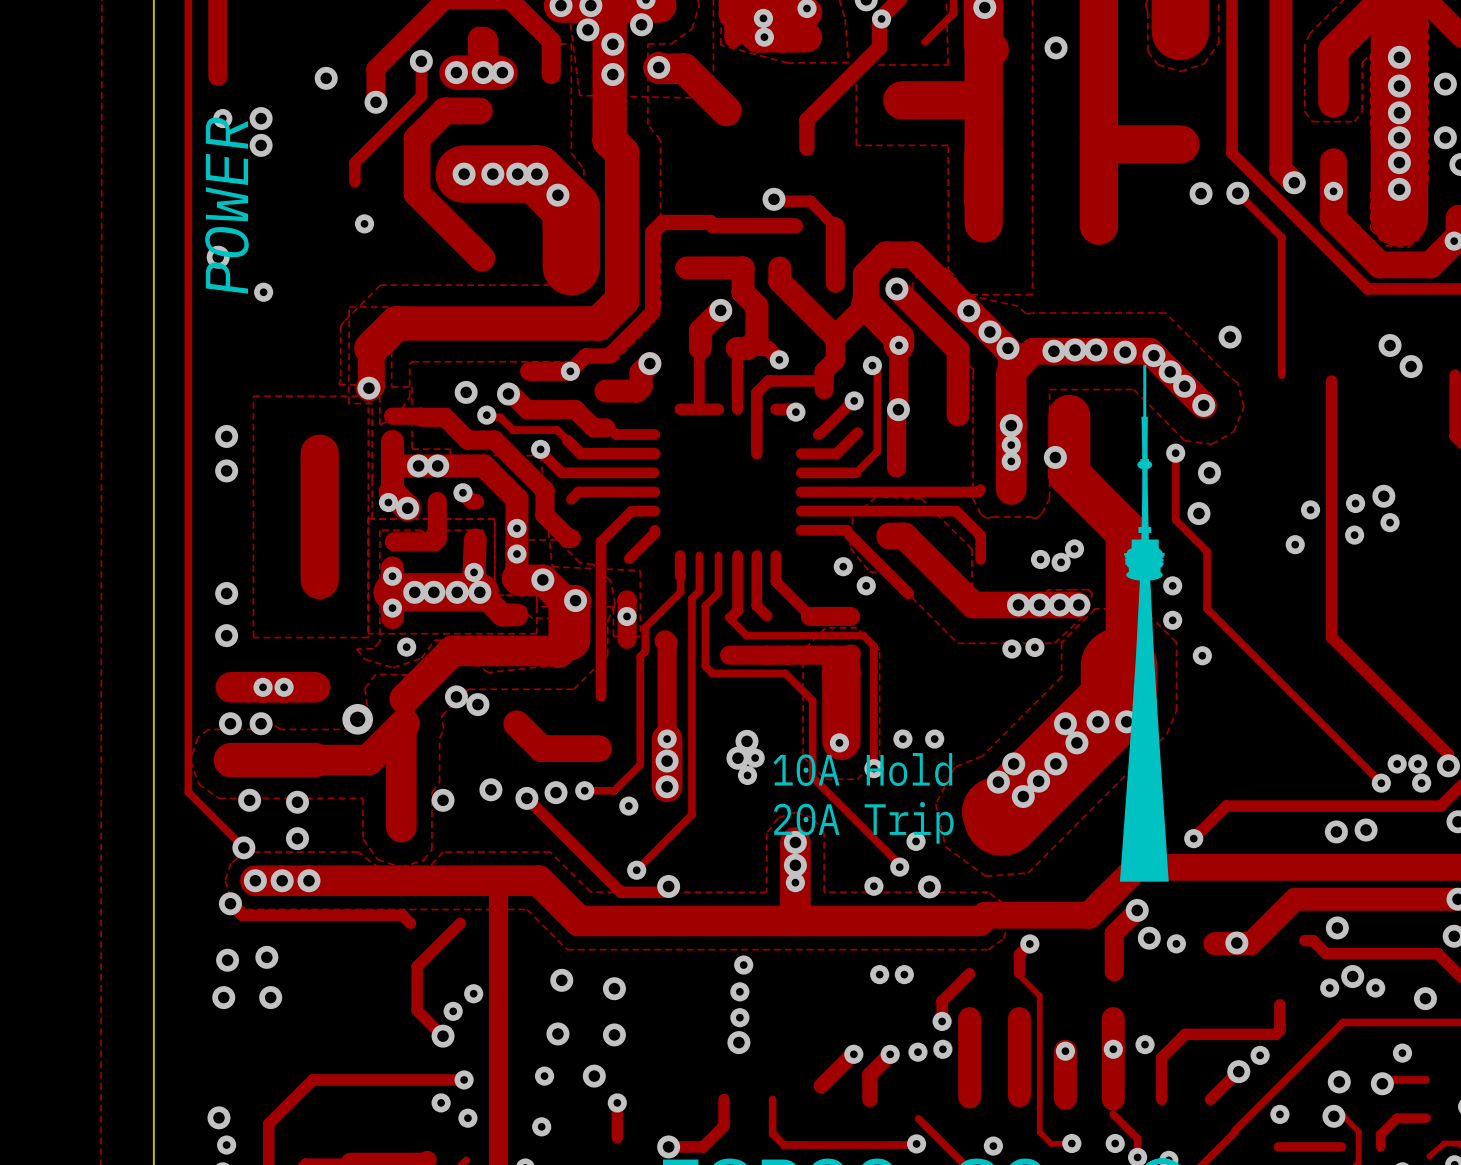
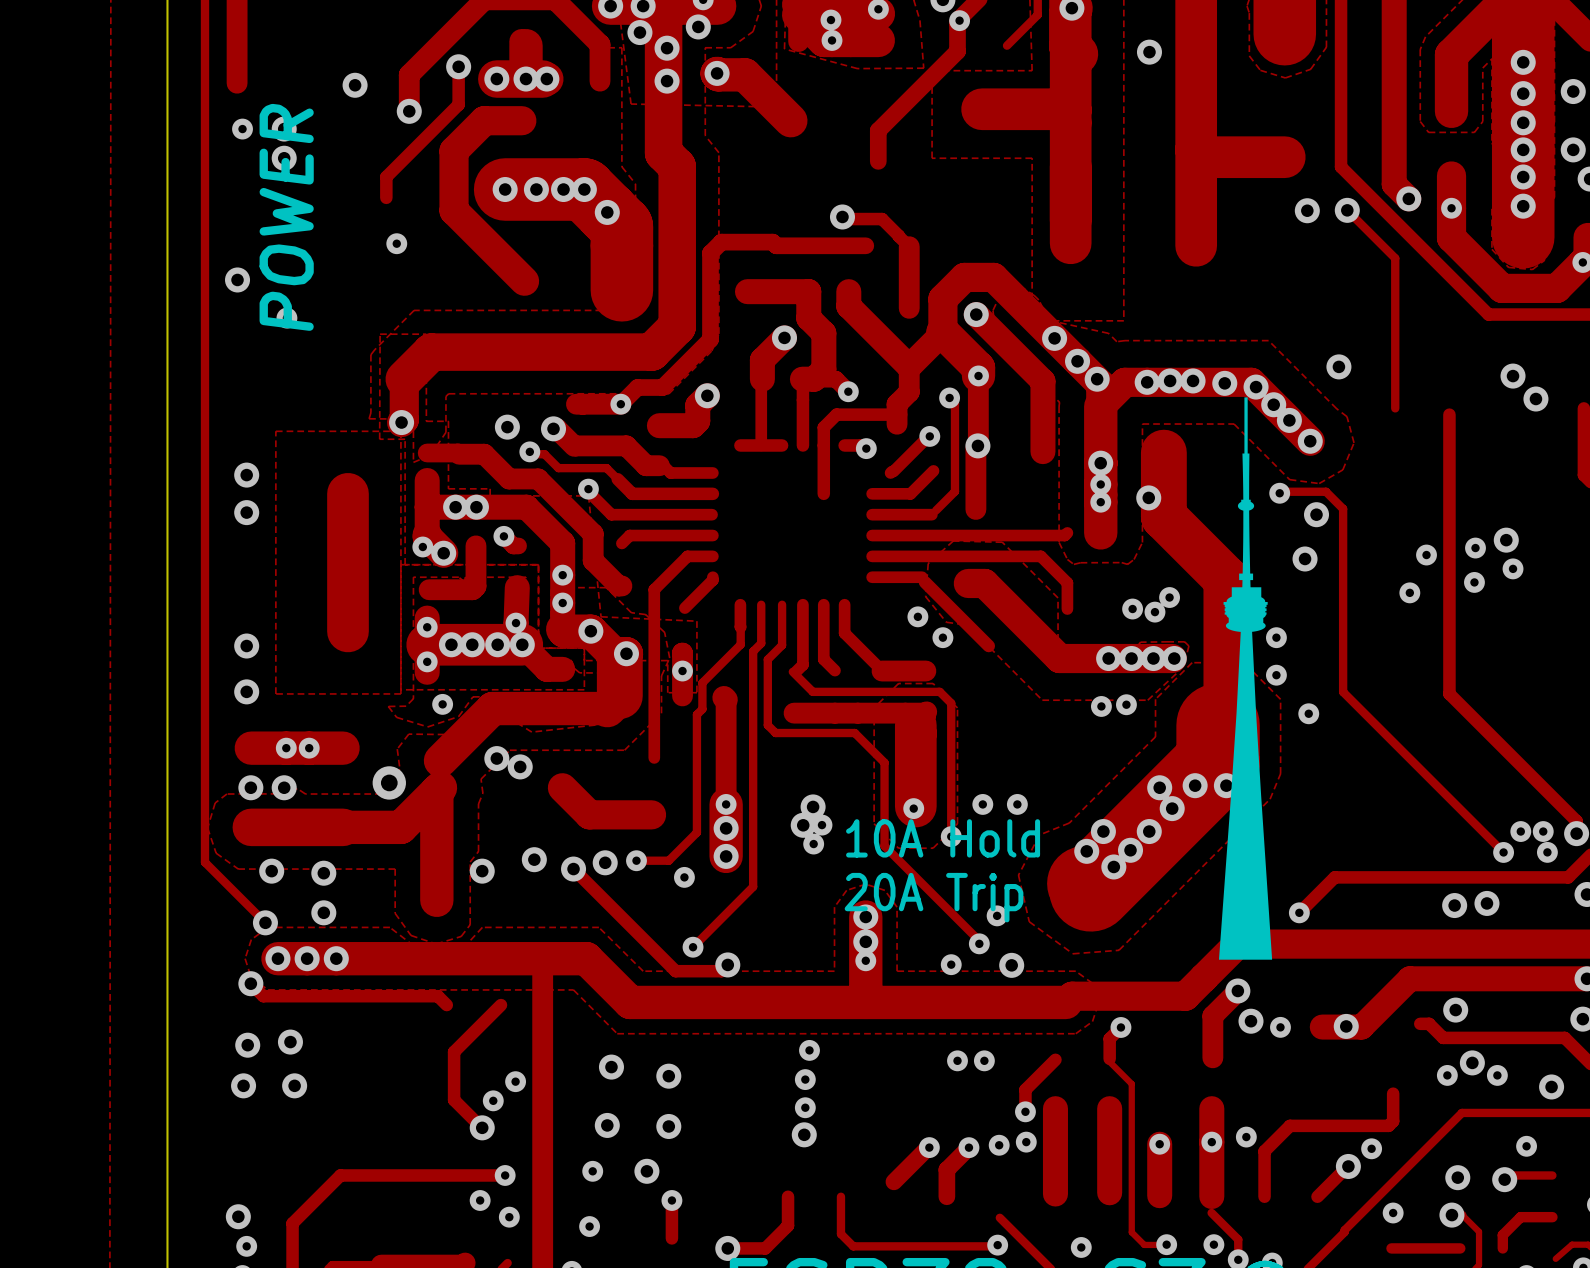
text position: POWER (226, 205) -> POWER (286, 217)
track: (1175, 453) (1175, 520) (1207, 551) (1207, 608) (1233, 635) -> (1279, 493) (1326, 491) (1343, 508) (1343, 692)

